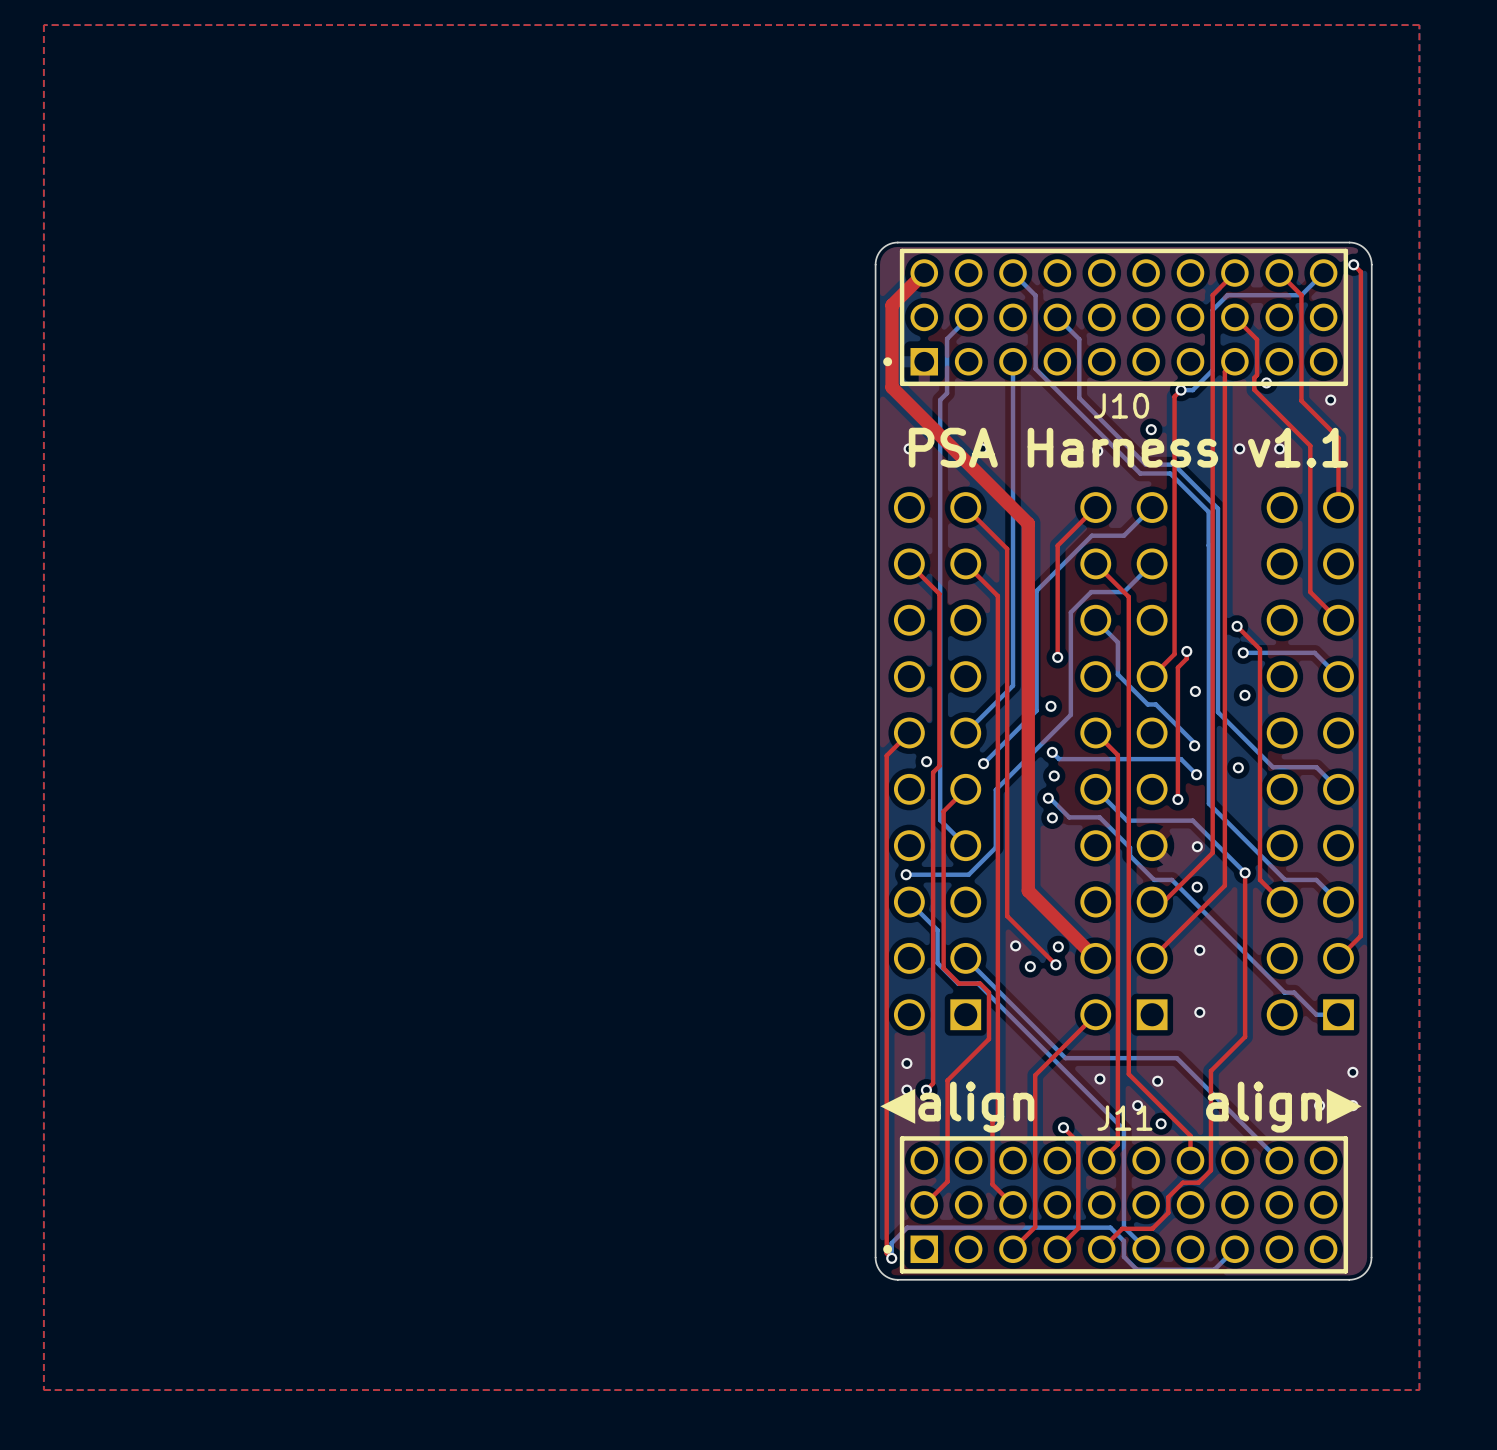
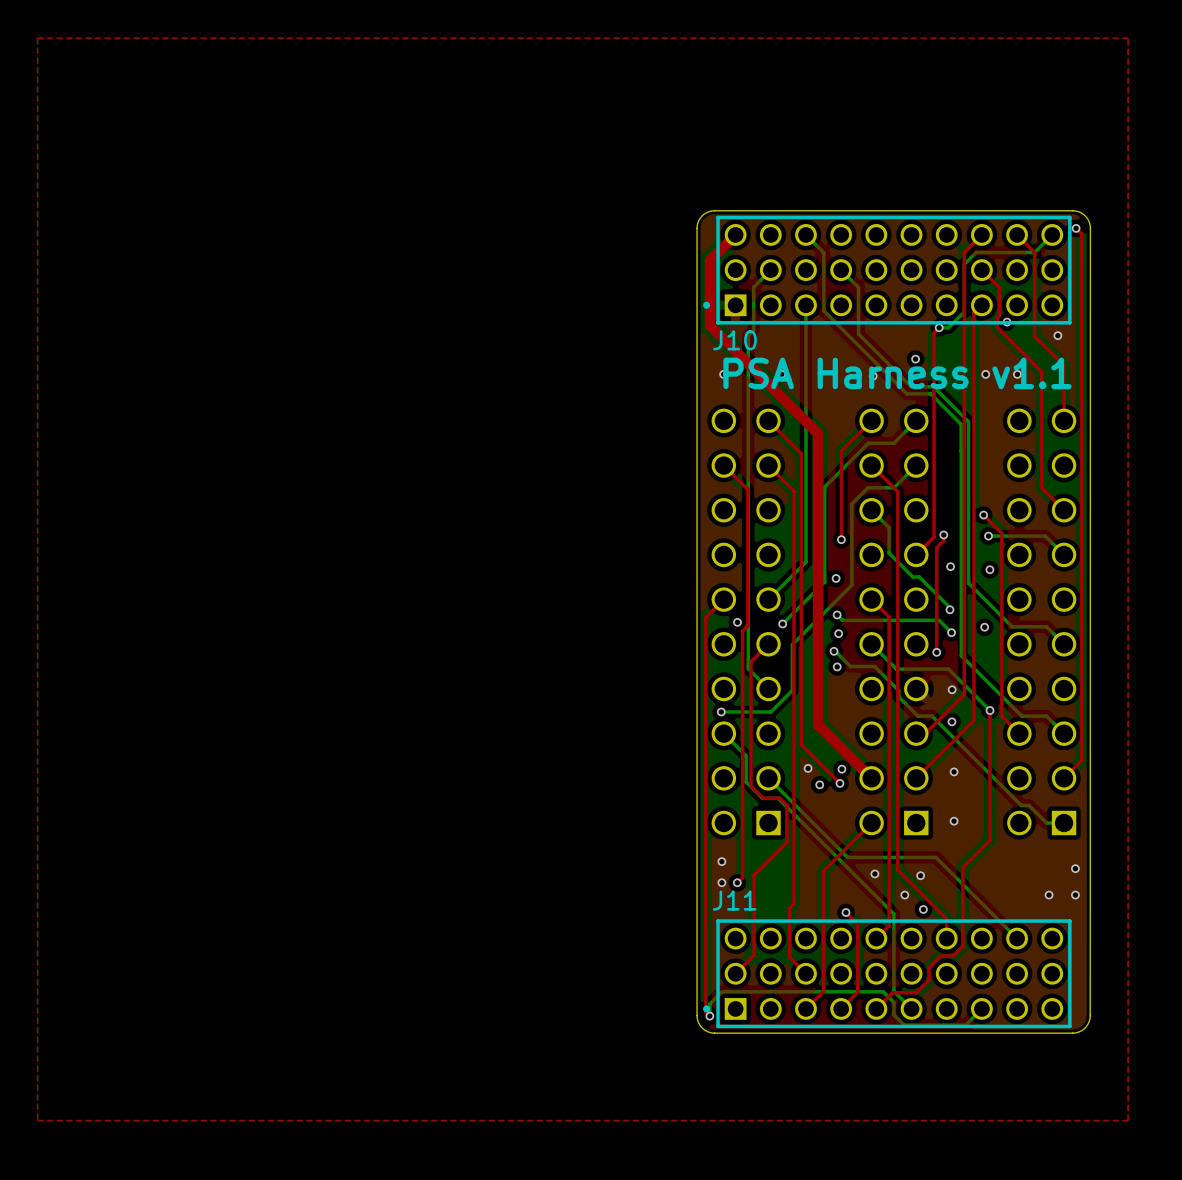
J10 name position: J10 (1121, 405) -> J10 (735, 340)
text: ◀align (955, 1107) -> none
text: align▶ (1285, 1107) -> none
J11 name position: J11 (1124, 1118) -> J11 (734, 900)

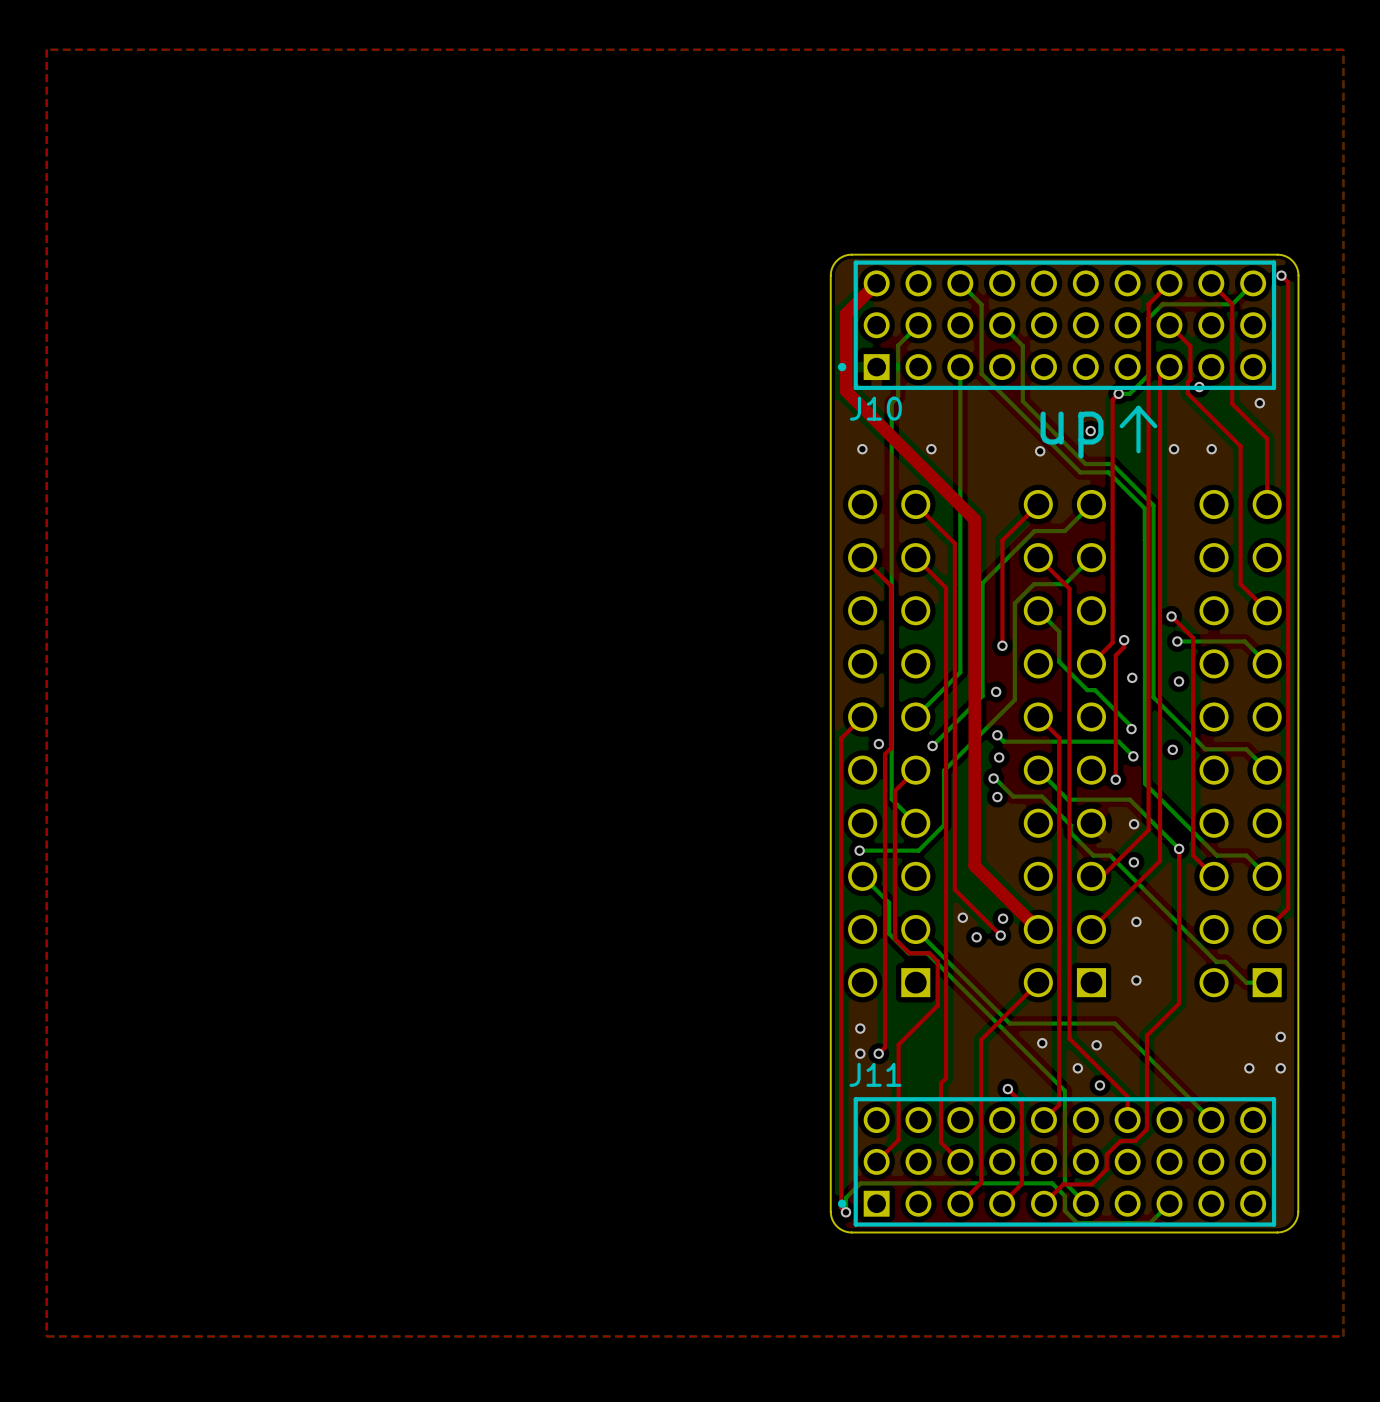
line: none -> (1138, 407) (1155, 426)
line: none -> (1138, 407) (1138, 451)
line: none -> (1138, 407) (1121, 426)
text: none -> up (1072, 435)
text: PSA Harness v1.1 (897, 373) -> none

